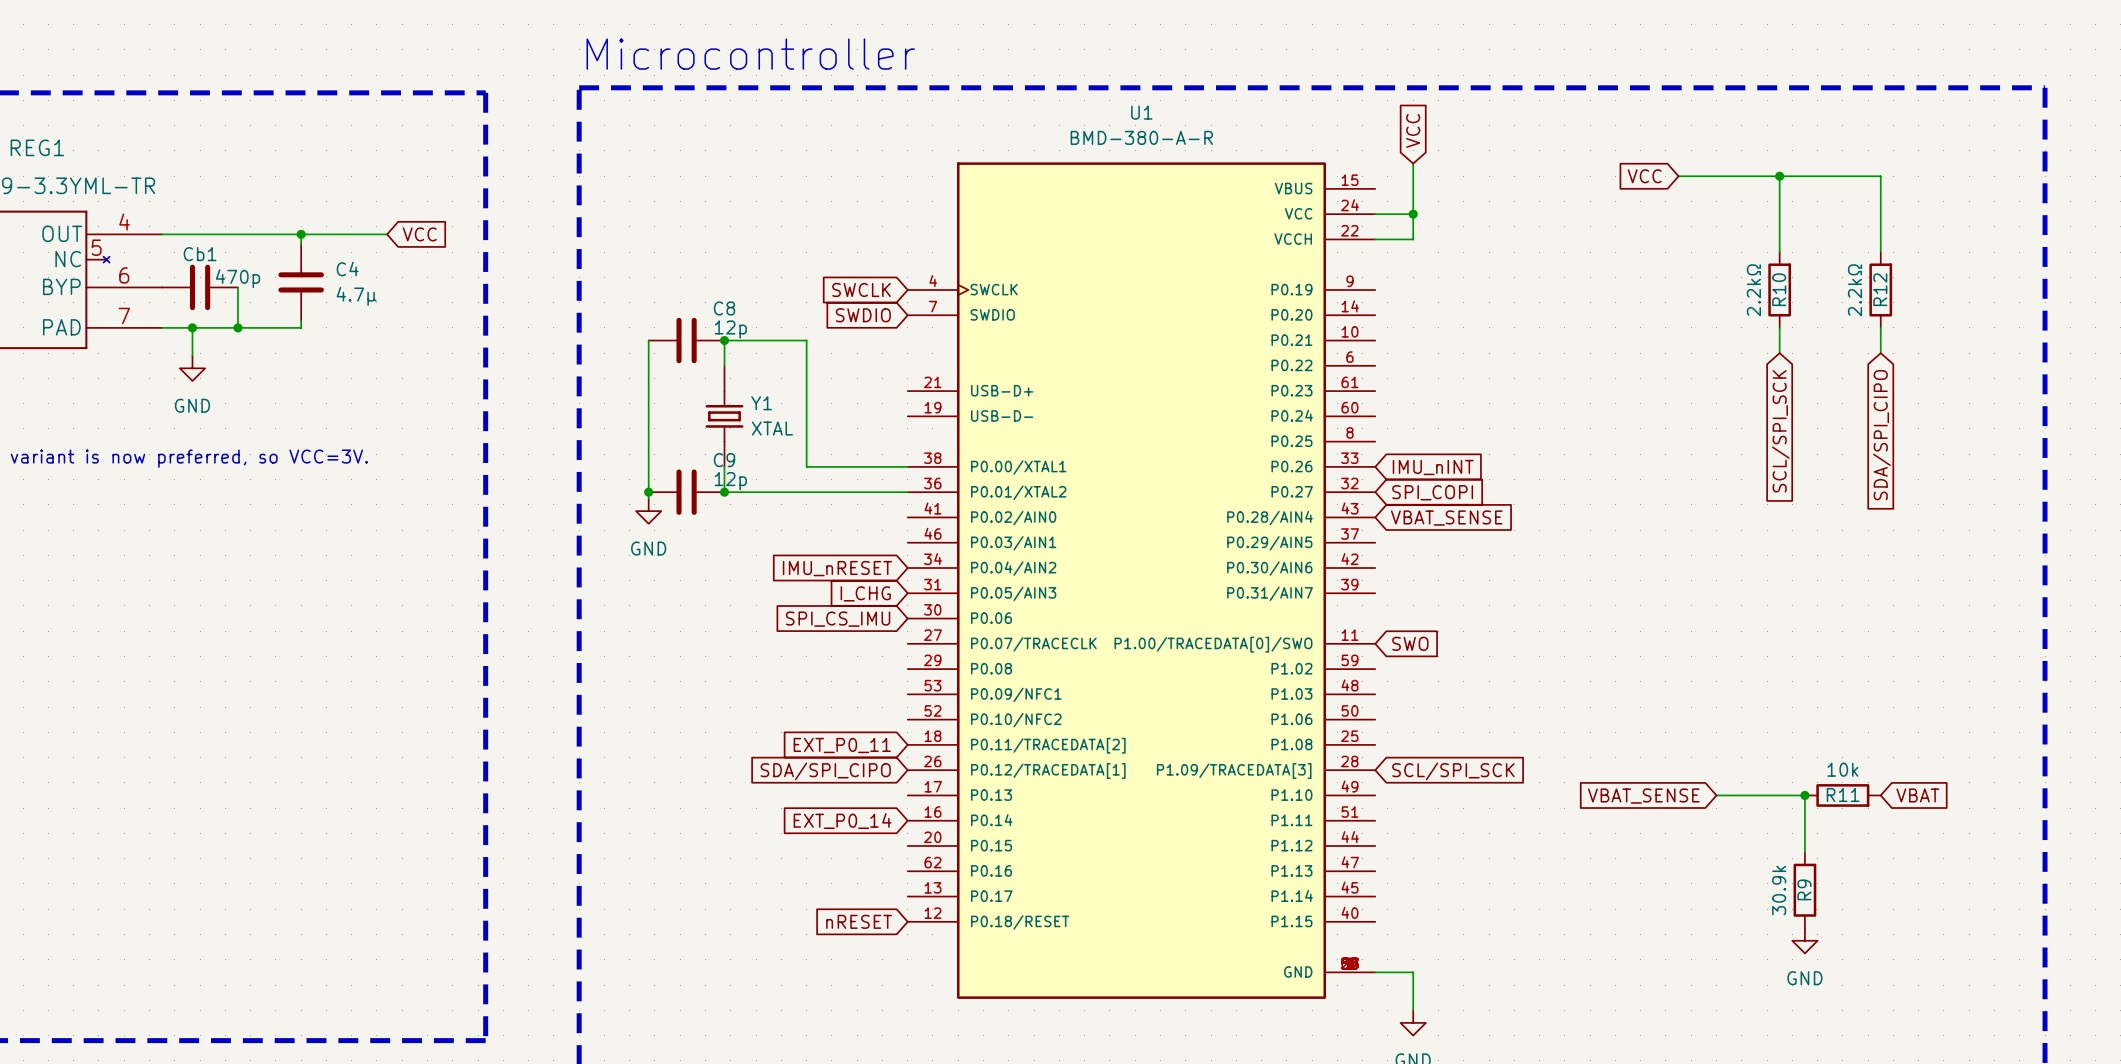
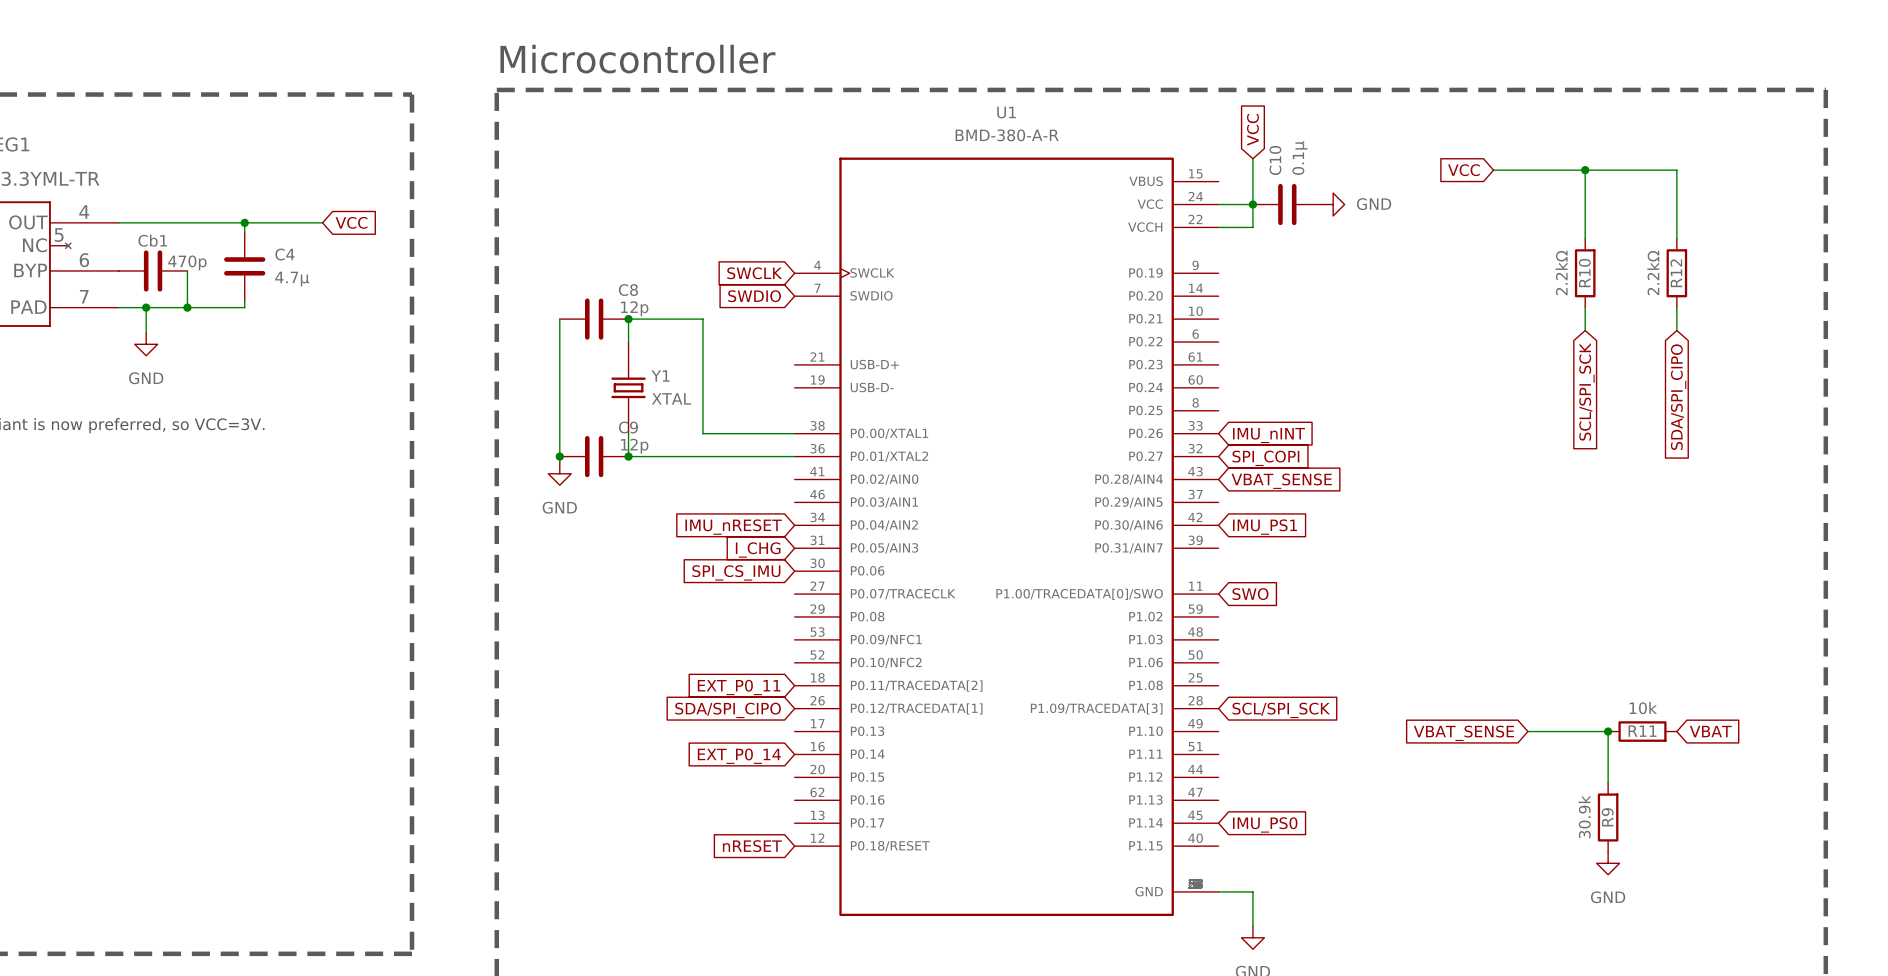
C10: none -> 0.1µ (1287, 204)
power symbol: none -> GND (1333, 204)
global label: none -> IMU_PS1 (1265, 527)
global label: none -> IMU_PS0 (1265, 824)

